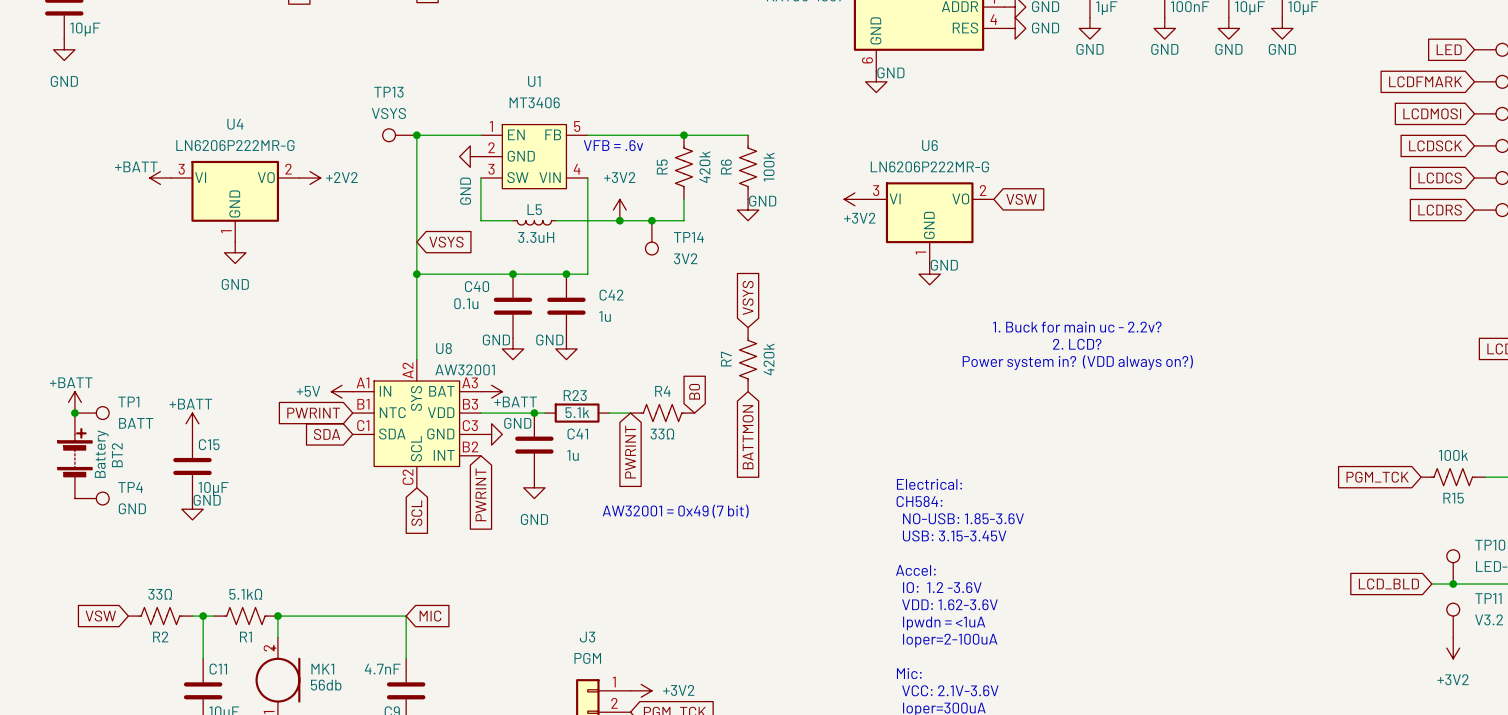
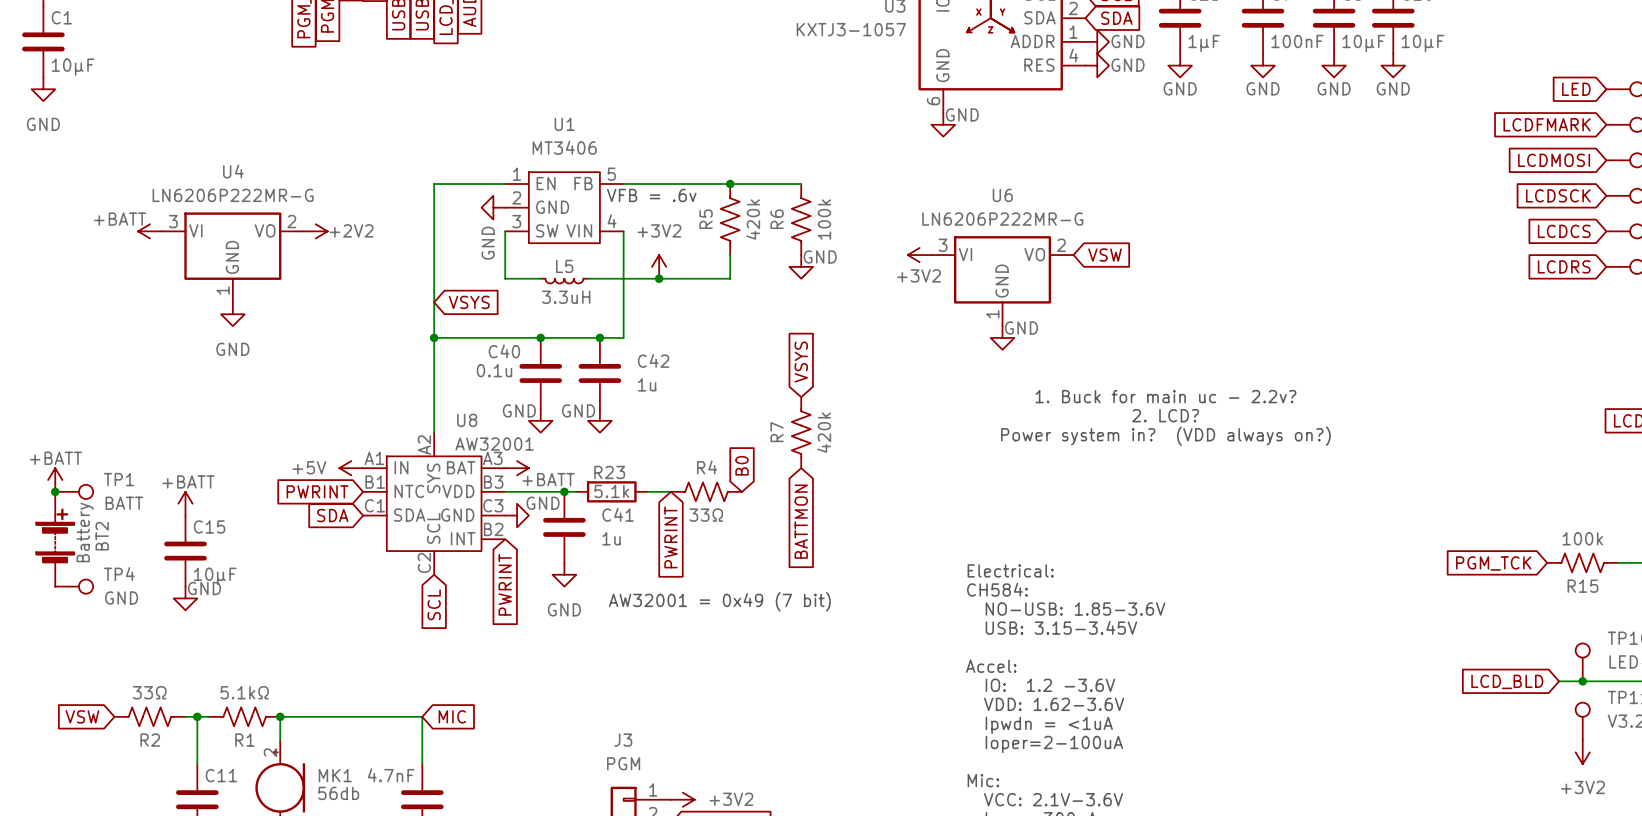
TP13: VSYS (399, 135) -> none
junction: (416, 135) -> none
junction: (651, 220) -> none
TP14: 3V2 (651, 237) -> none

